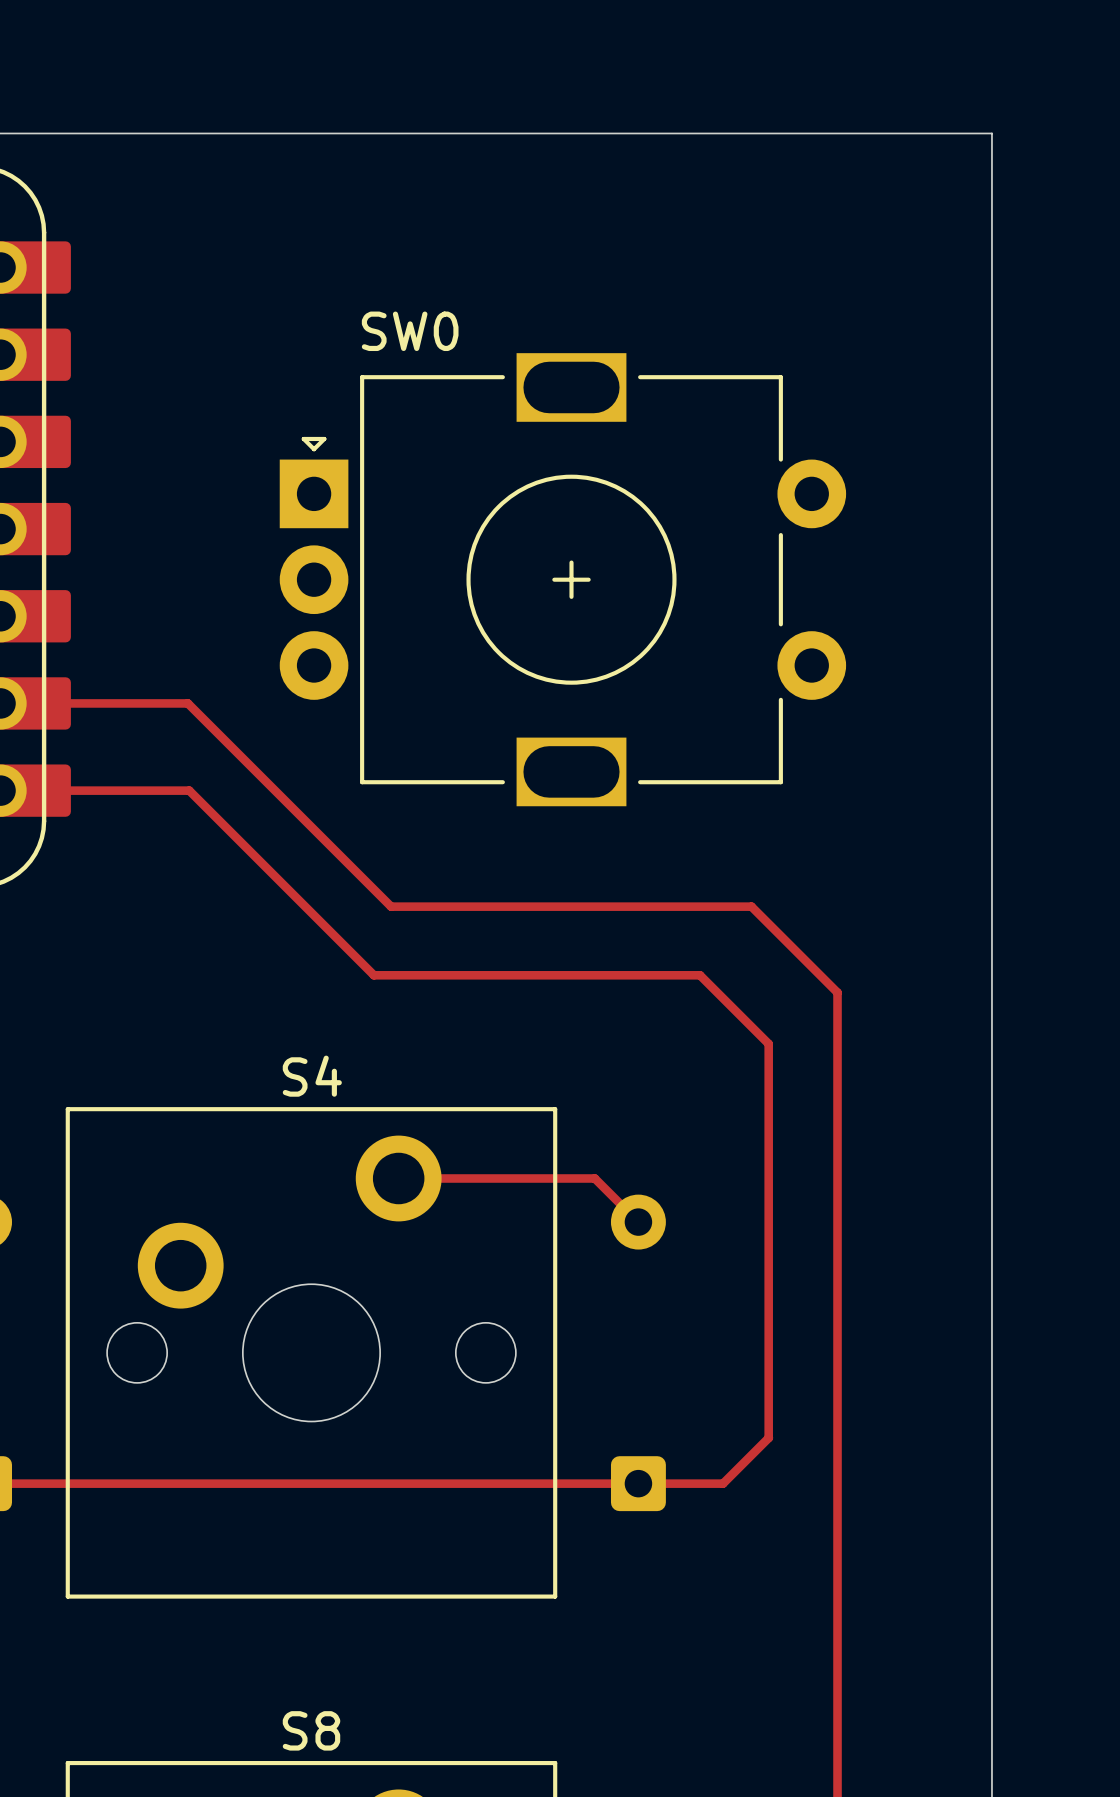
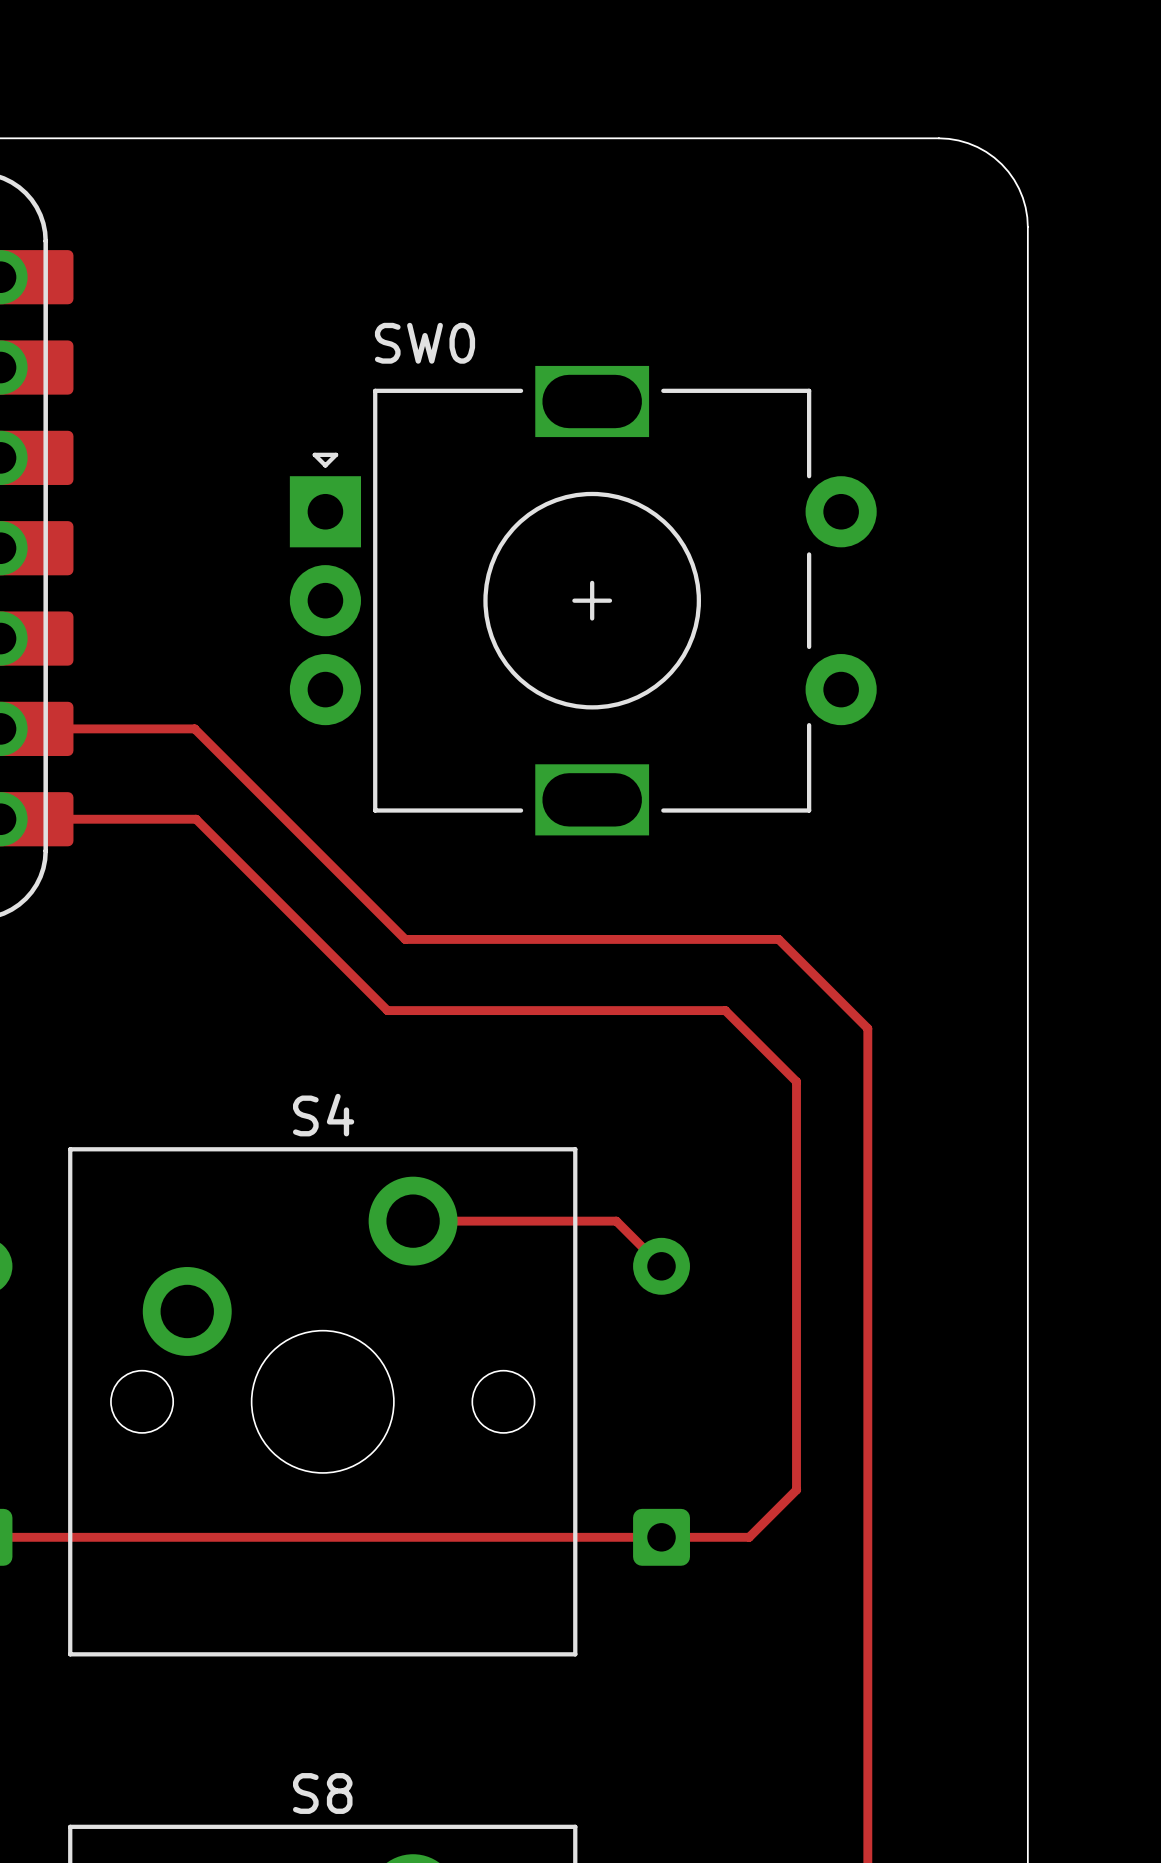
board edge: (906, 133) (991, 133) (991, 219) -> (938, 138) (968, 143) (986, 151) (1001, 164) (1014, 179) (1022, 197) (1027, 227)

